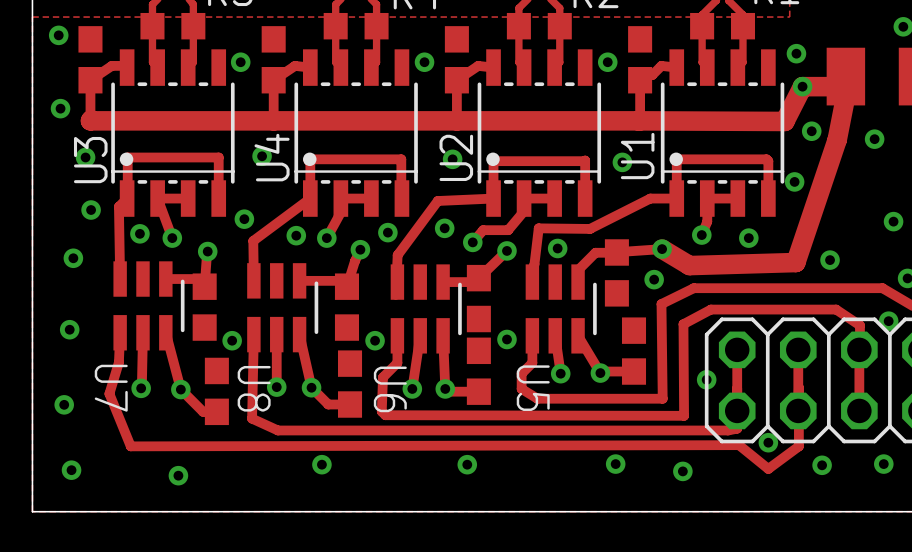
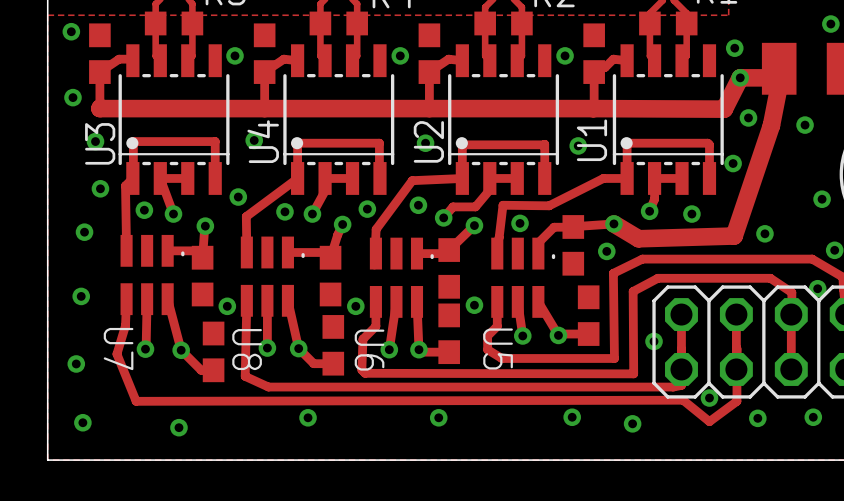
U7 footprint: [113, 261, 185, 351] -> [120, 234, 185, 316]
U8 footprint: [247, 263, 319, 353] -> [240, 236, 305, 317]
U6 footprint: [390, 264, 462, 354] -> [369, 237, 434, 318]
U5 footprint: [525, 264, 597, 354] -> [491, 237, 556, 318]

